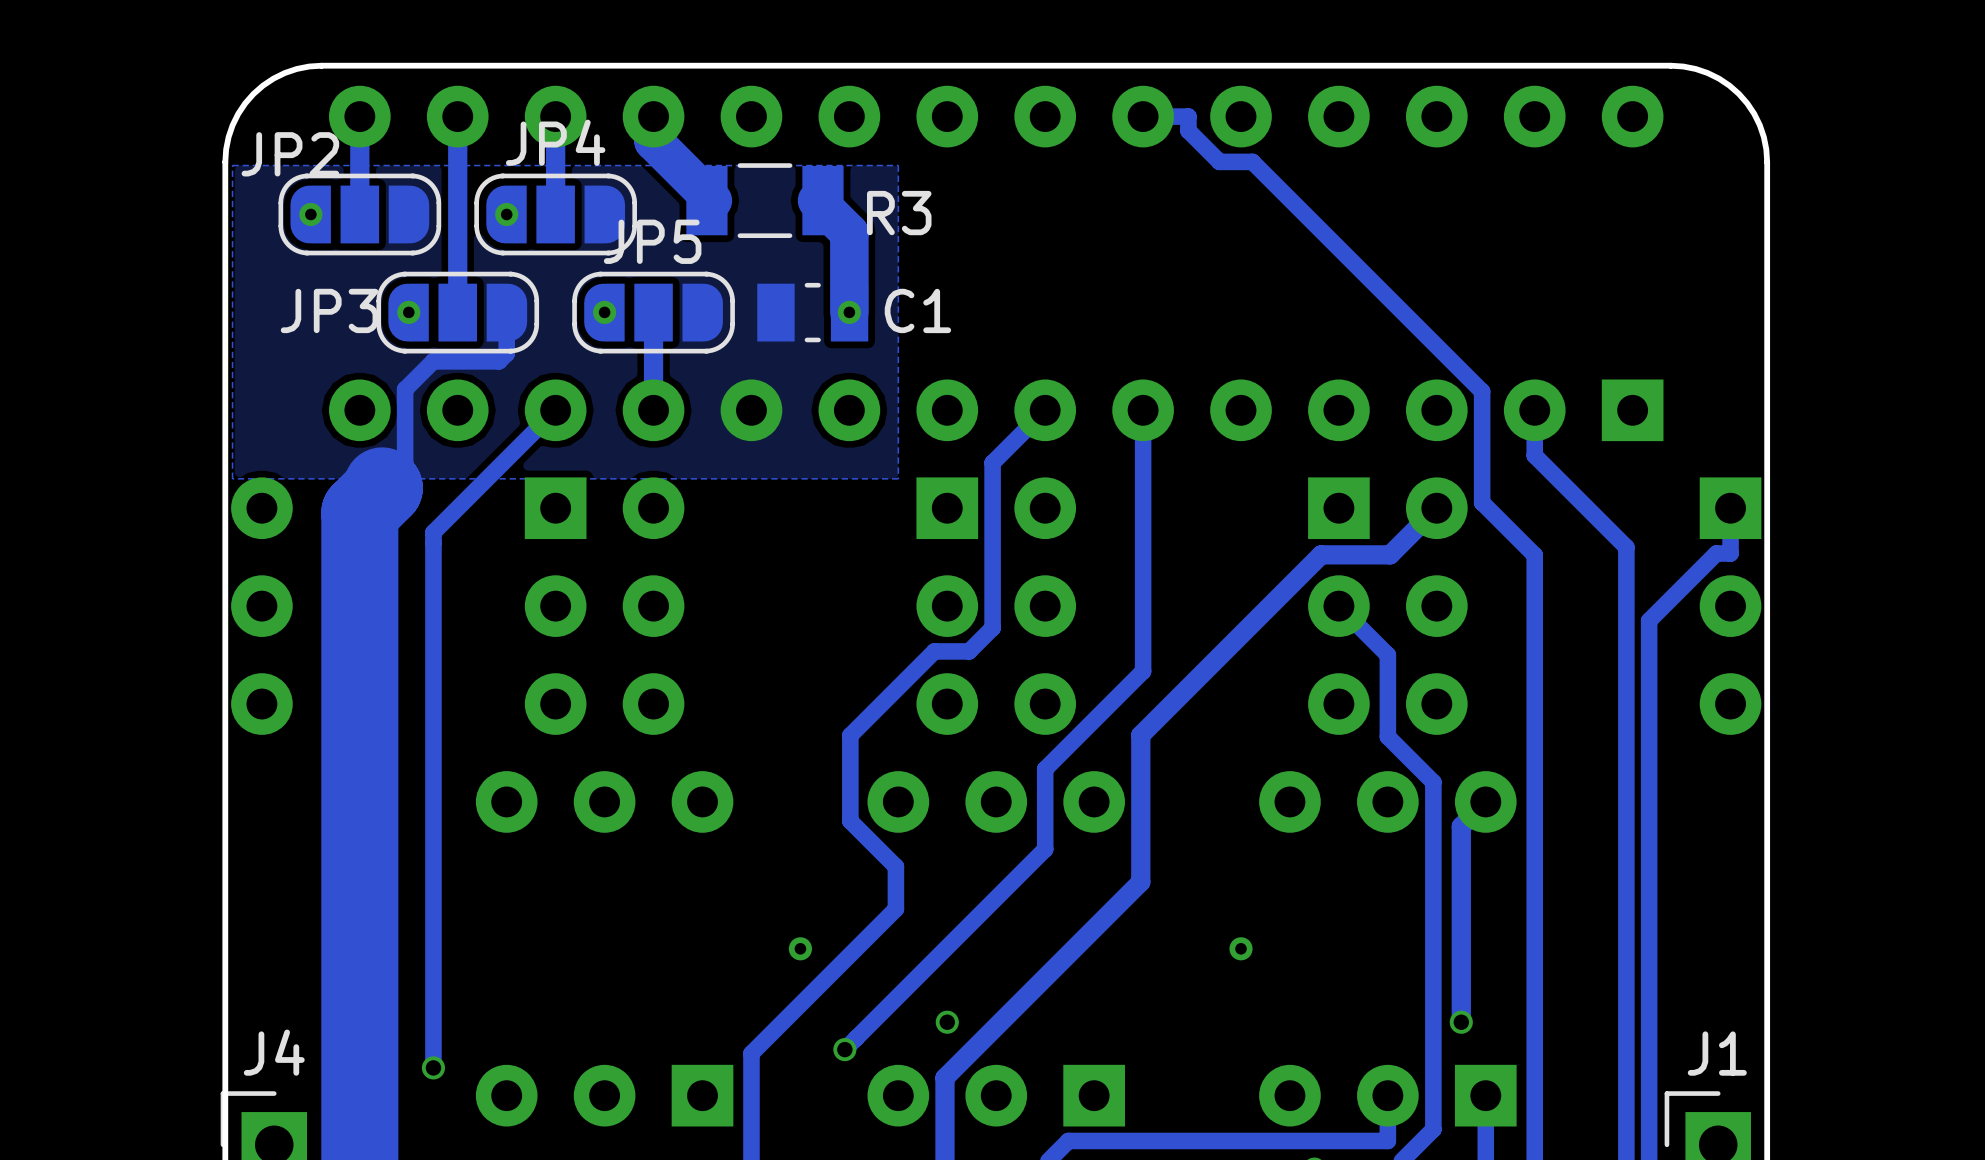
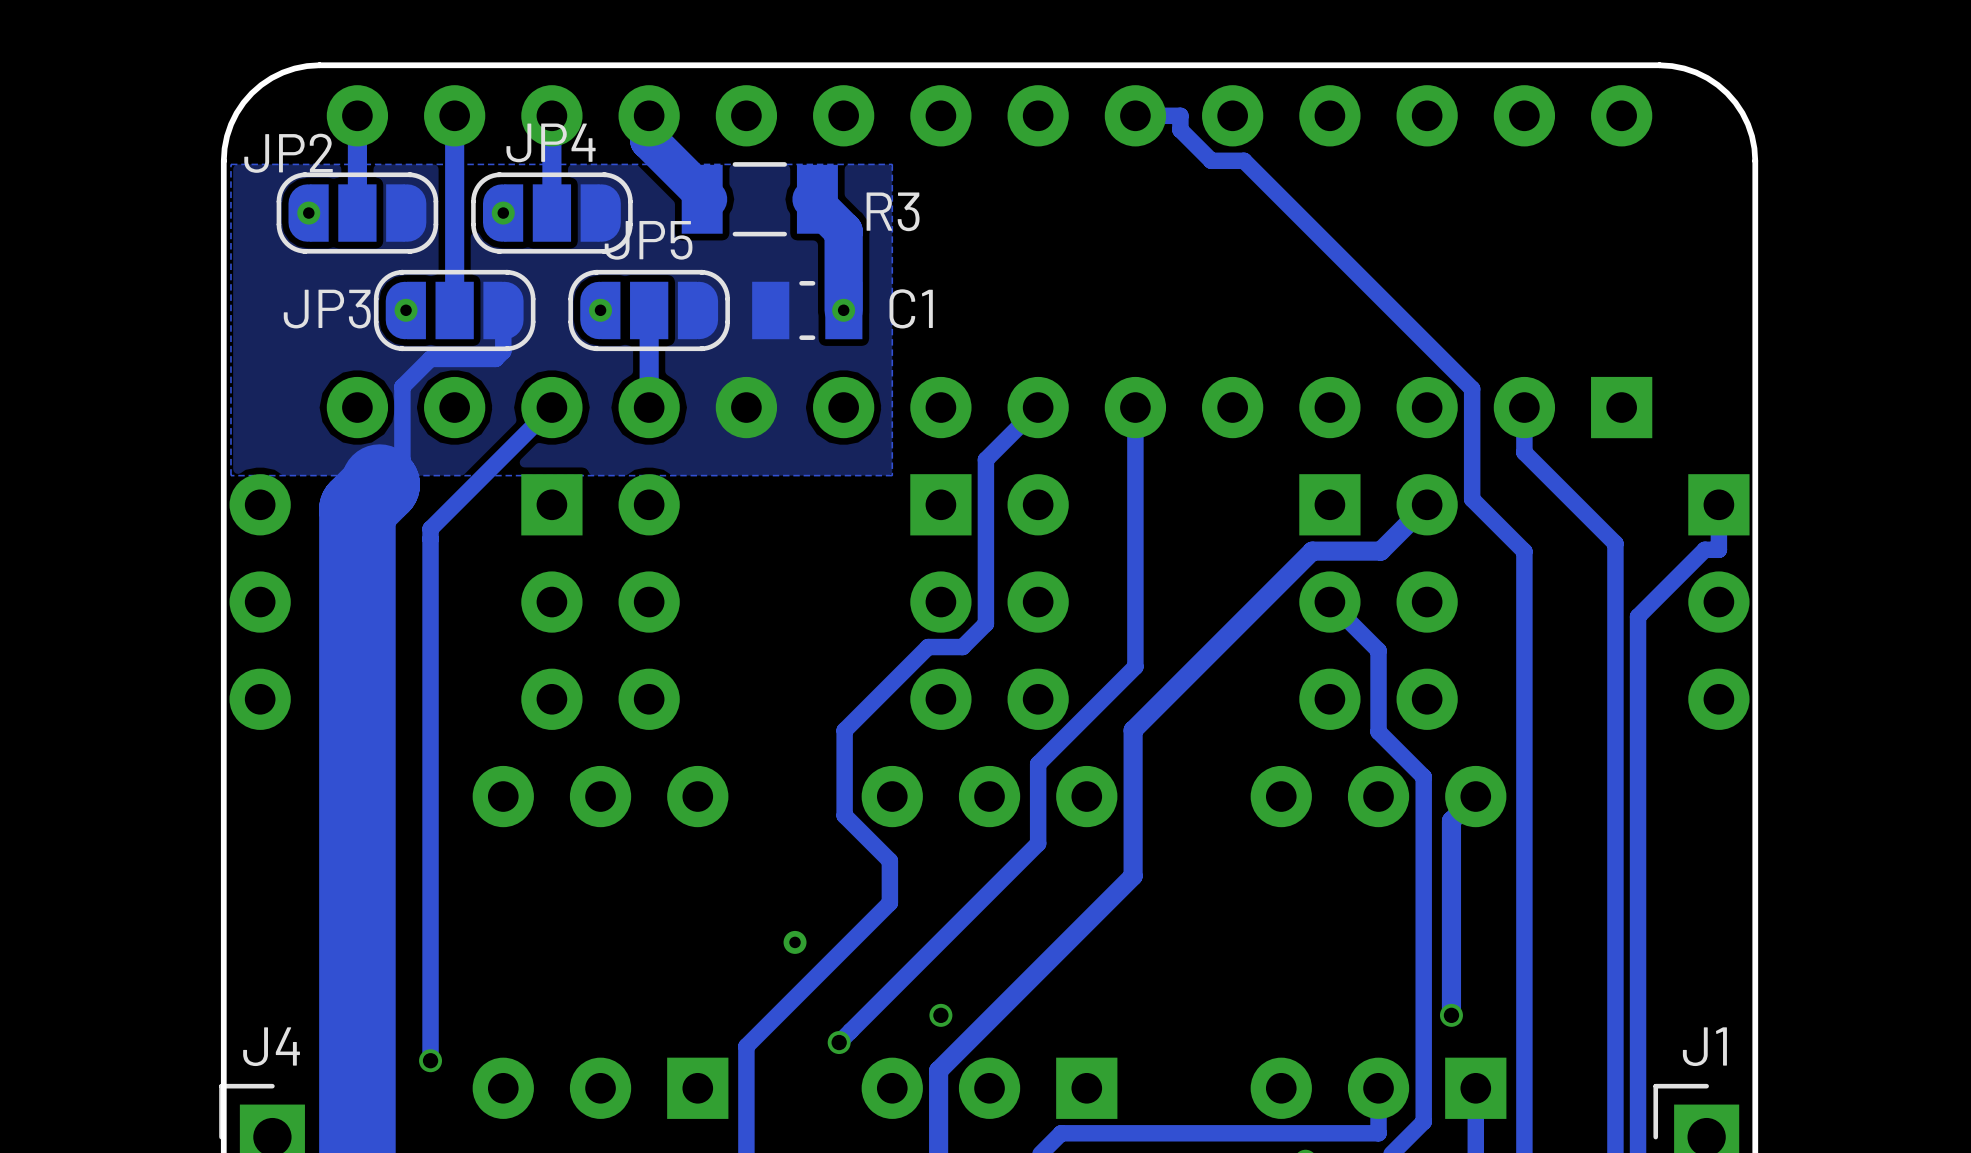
via: (1241, 948) -> none

